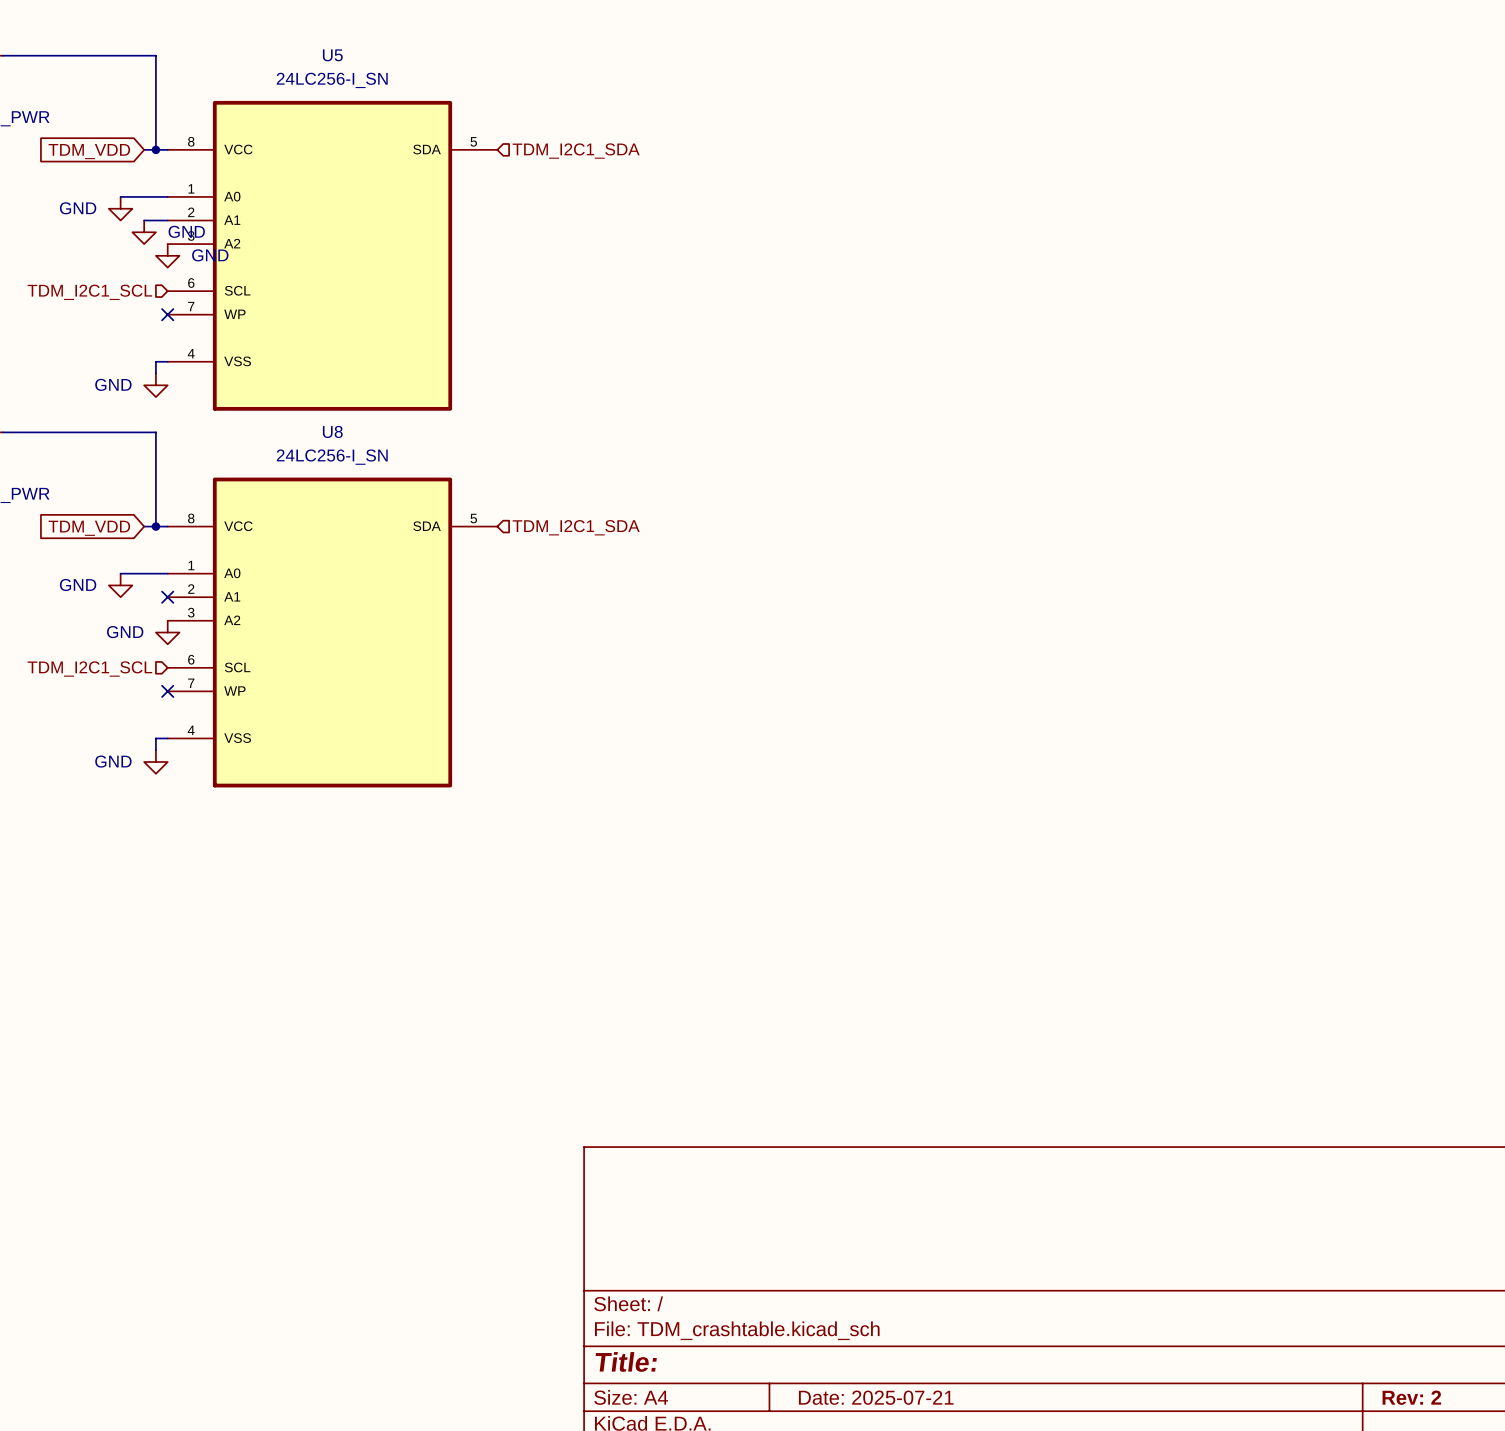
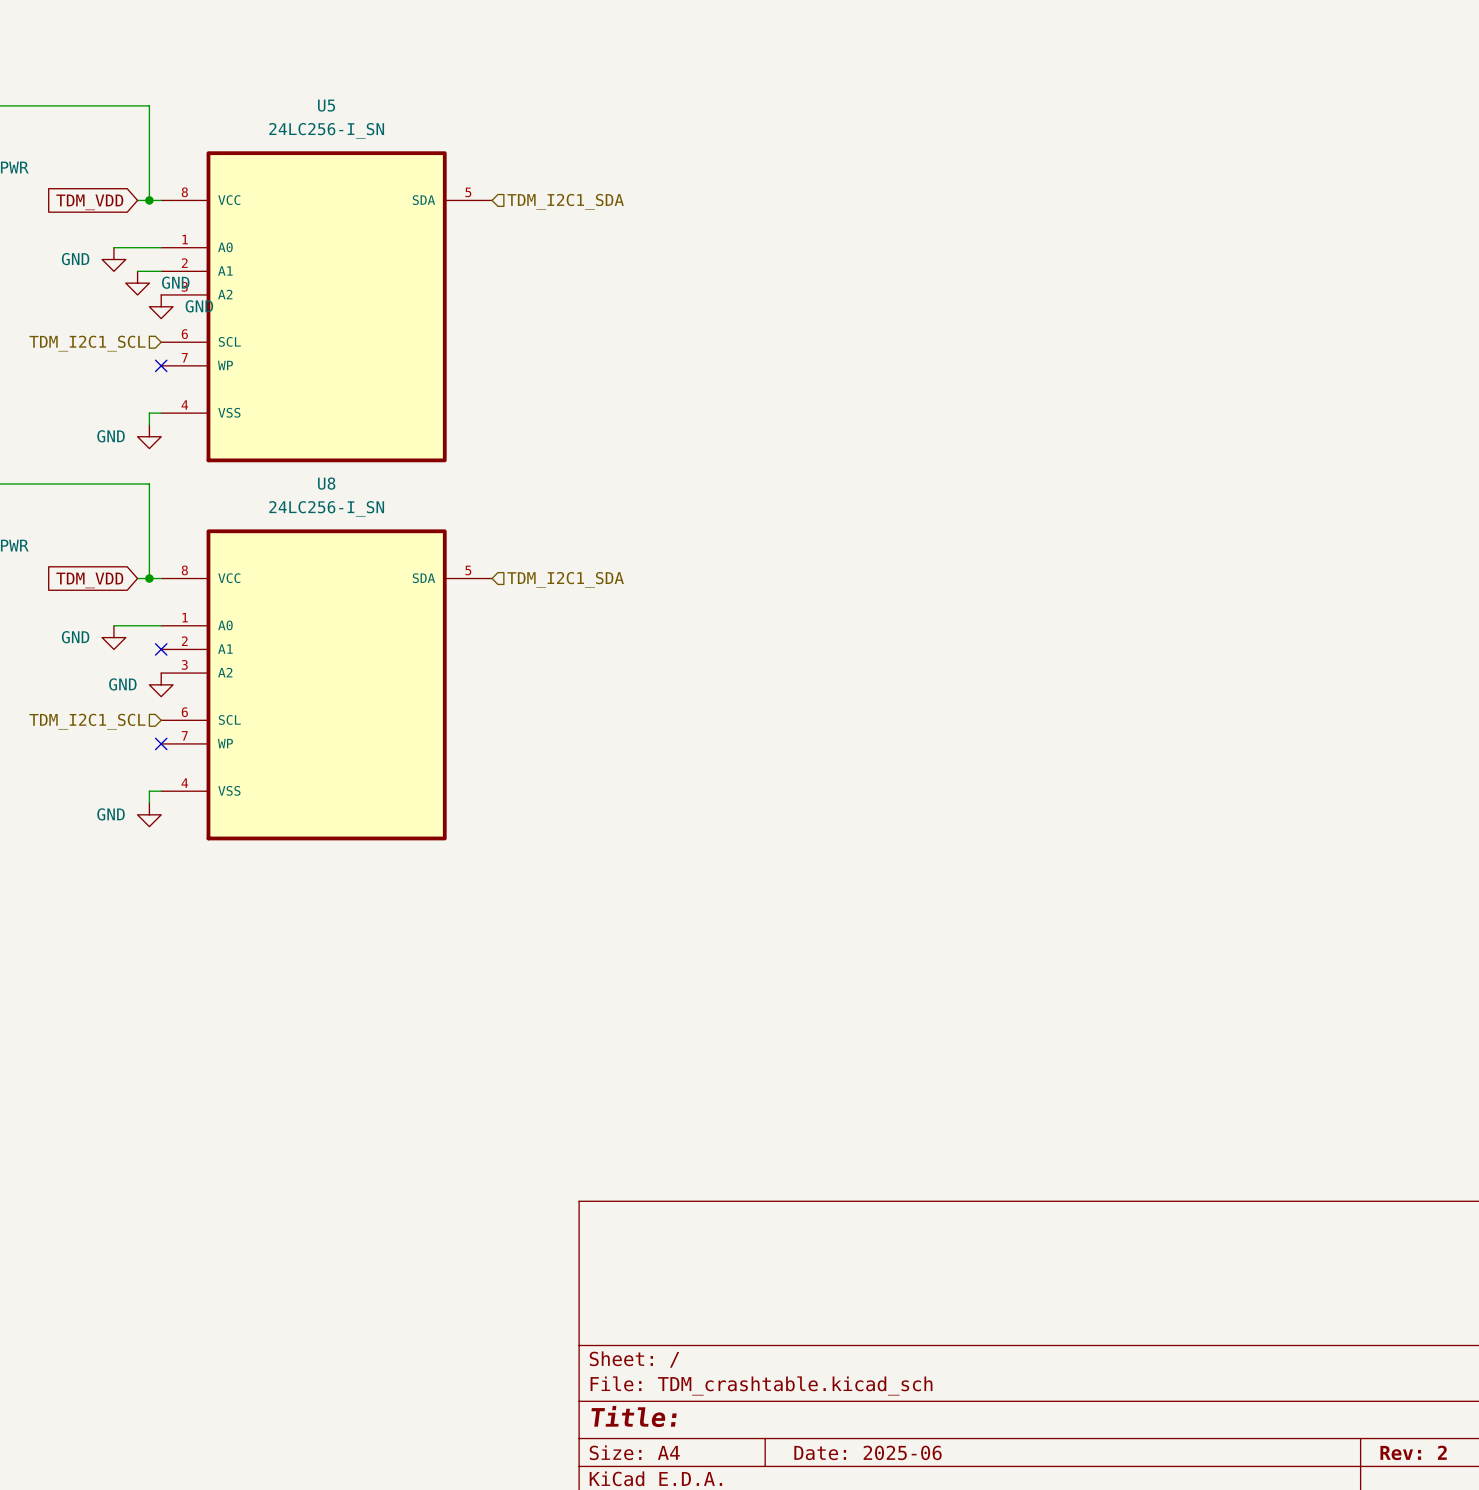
title block: Date: 2025-07-21 (876, 1397) -> Date: 2025-06 (868, 1452)

